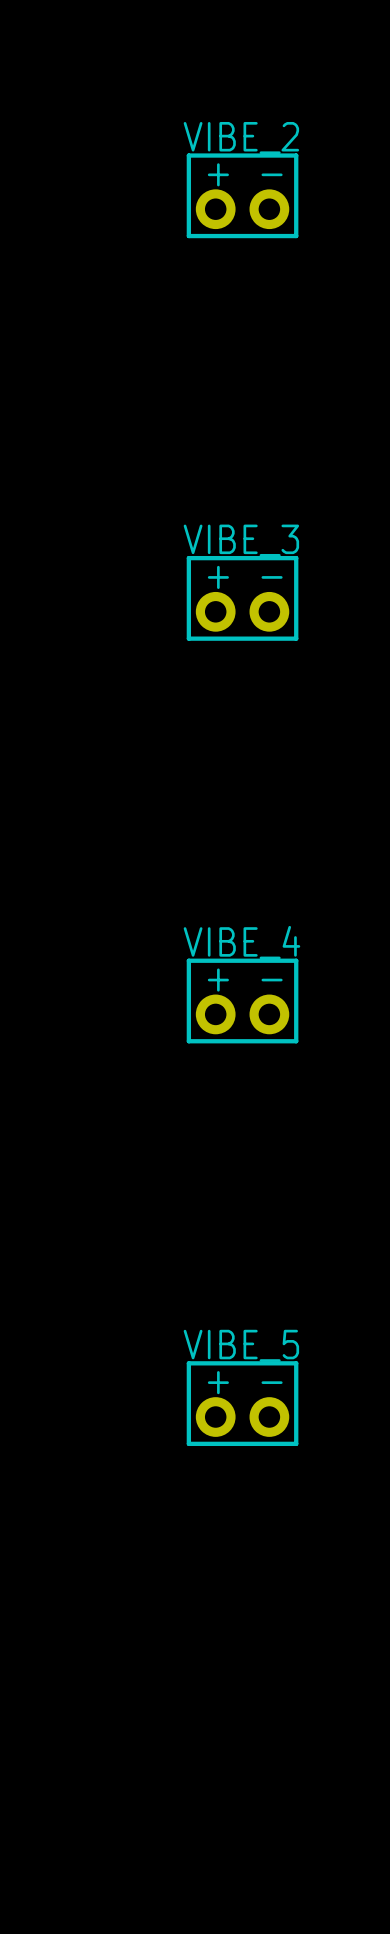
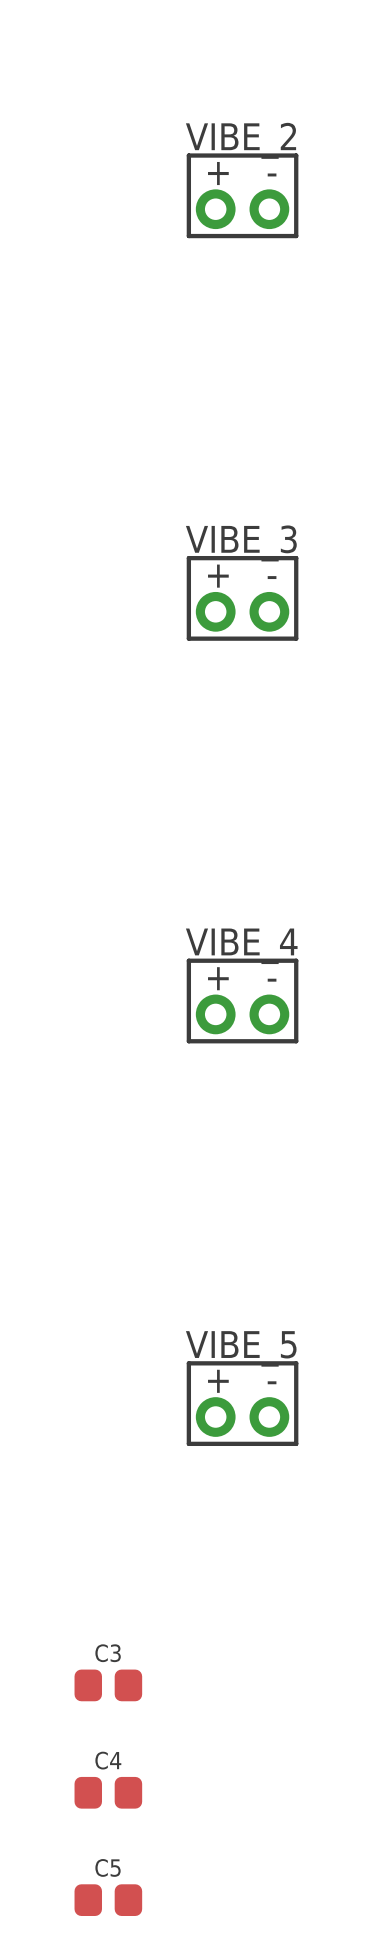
C3: none -> (108, 1685)
C4: none -> (108, 1792)
C5: none -> (108, 1900)

